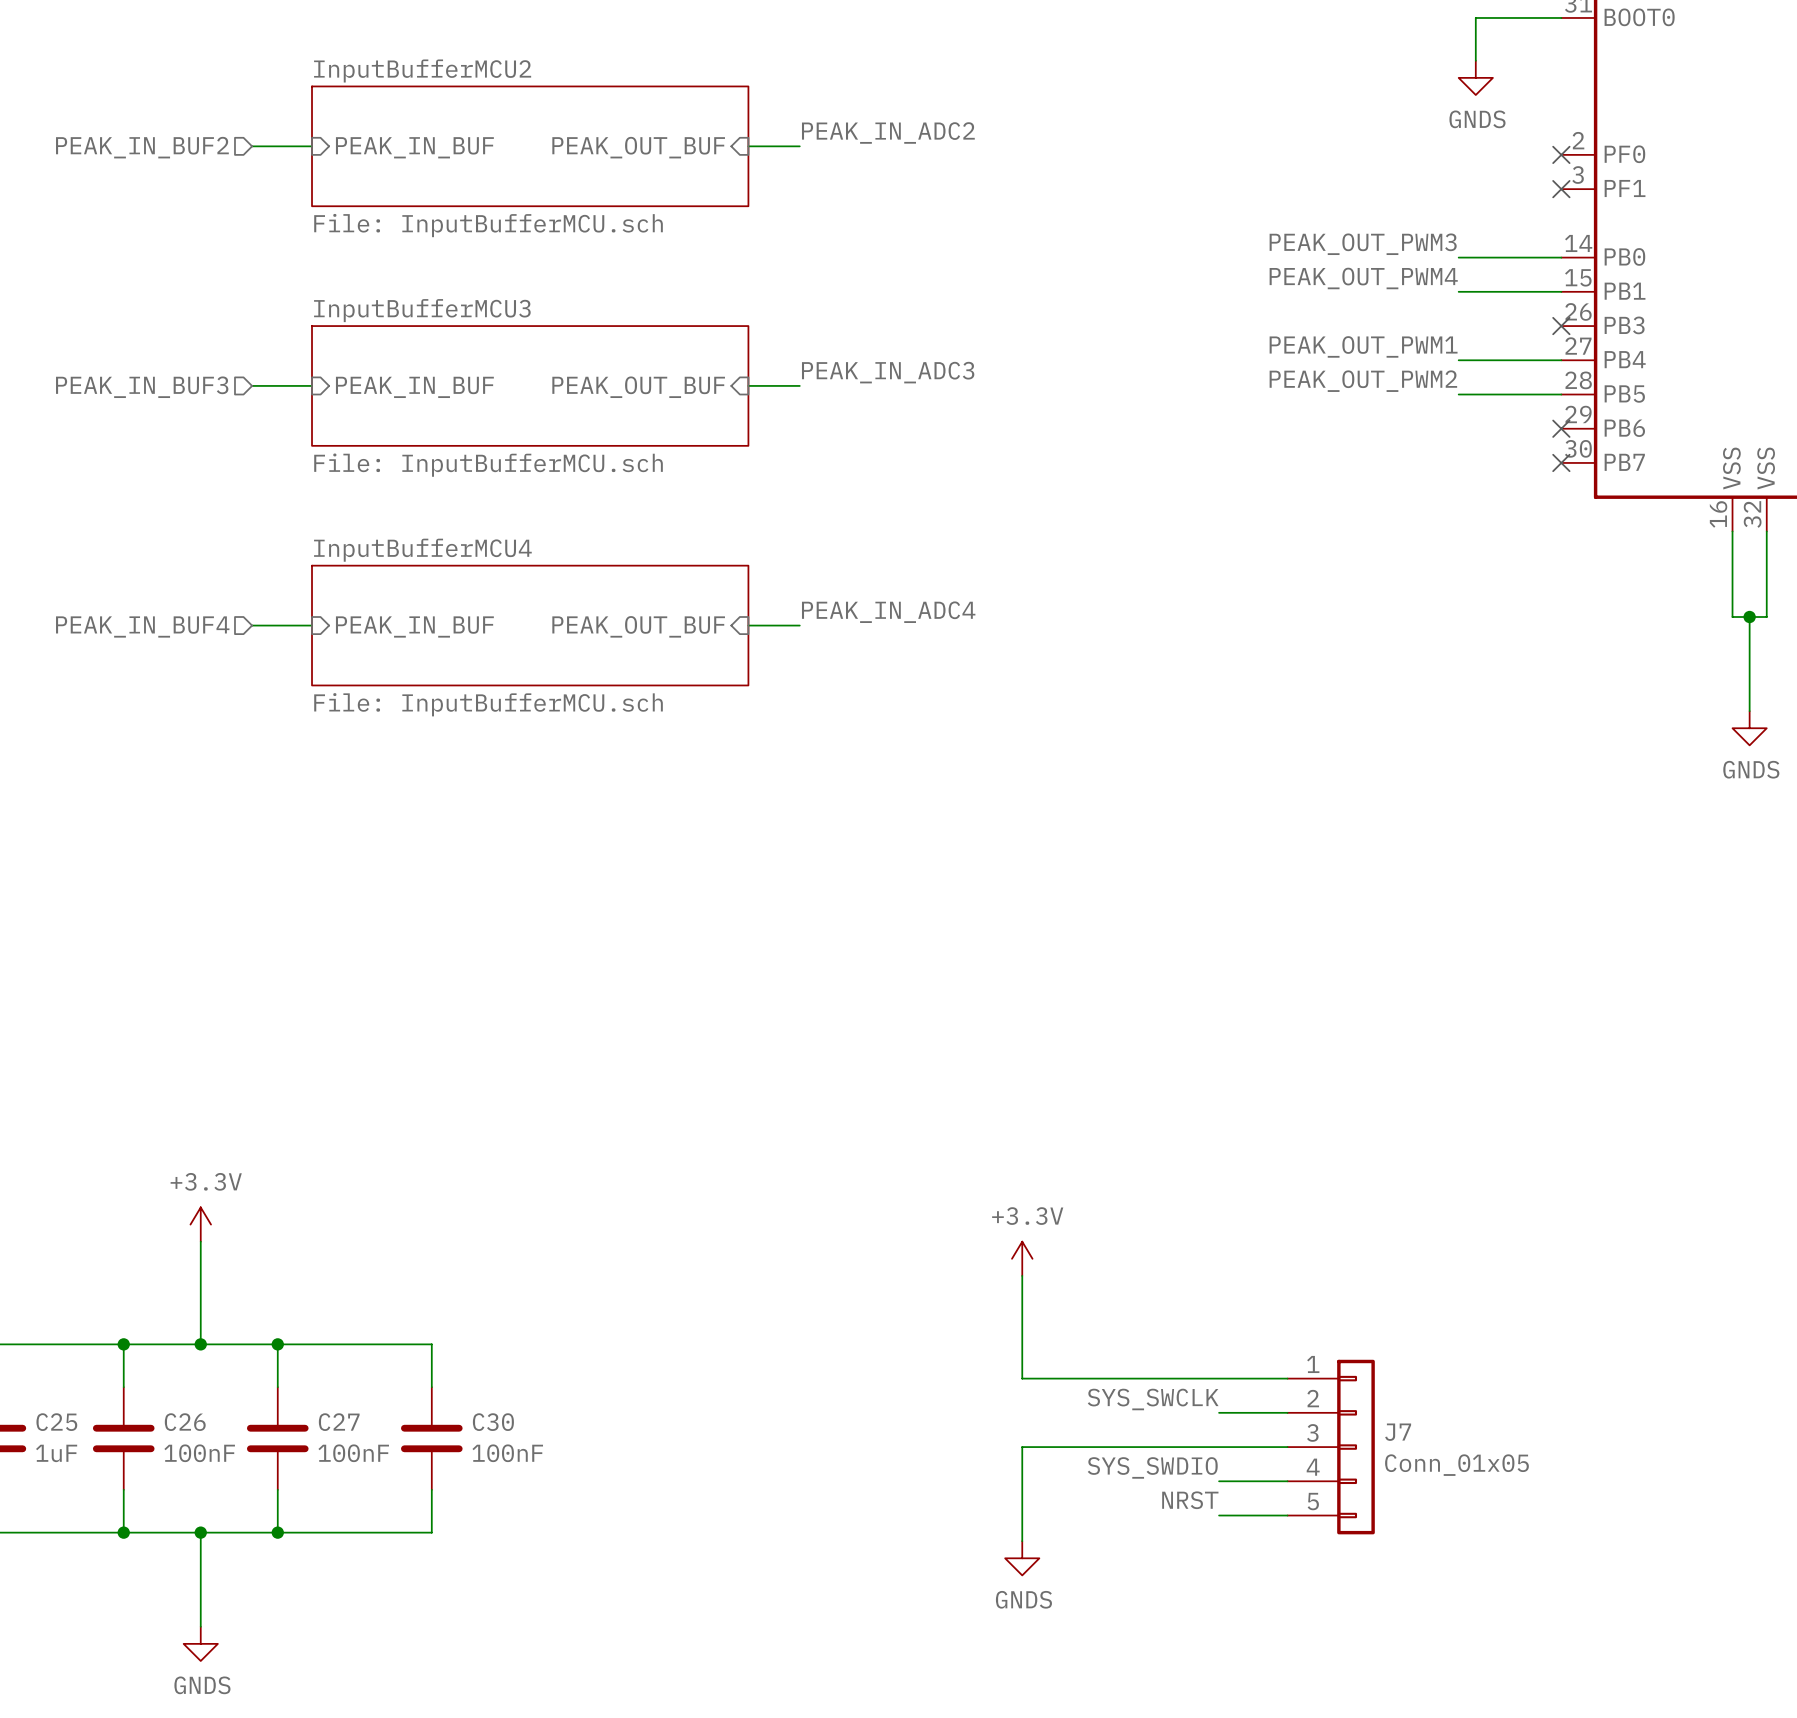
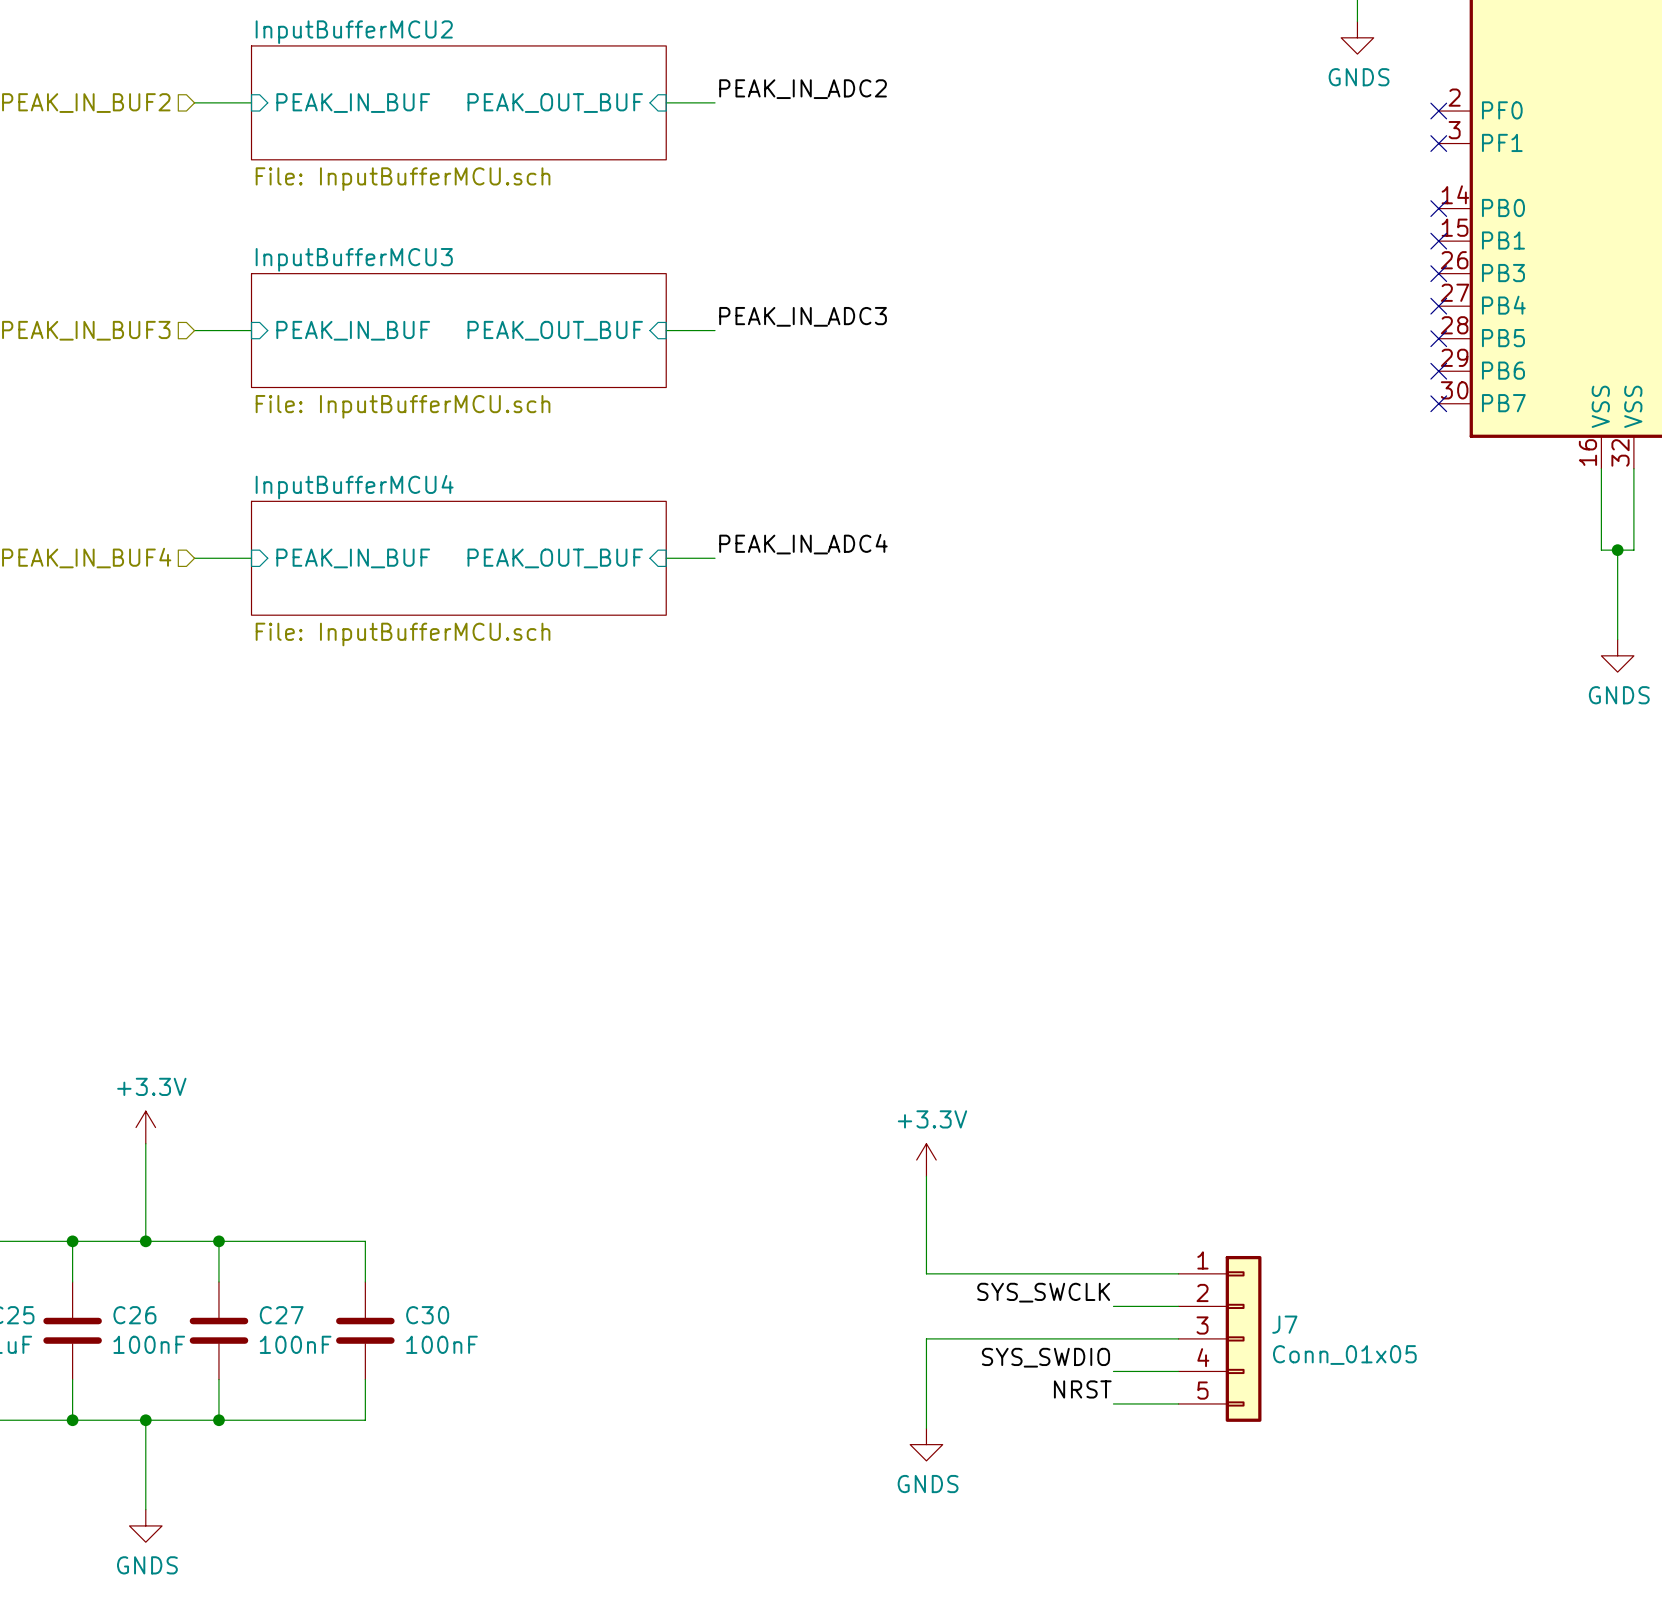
label: PEAK_OUT_PWM3 (1363, 244) -> none
wire: (1458, 257) (1561, 257) -> none
no-connect mark: none -> (1438, 208)
label: PEAK_OUT_PWM4 (1363, 278) -> none
wire: (1458, 291) (1561, 291) -> none
no-connect mark: none -> (1438, 241)
label: PEAK_OUT_PWM1 (1363, 346) -> none
wire: (1458, 360) (1561, 360) -> none
no-connect mark: none -> (1438, 306)
label: PEAK_OUT_PWM2 (1363, 381) -> none
wire: (1458, 394) (1561, 394) -> none
no-connect mark: none -> (1438, 338)

